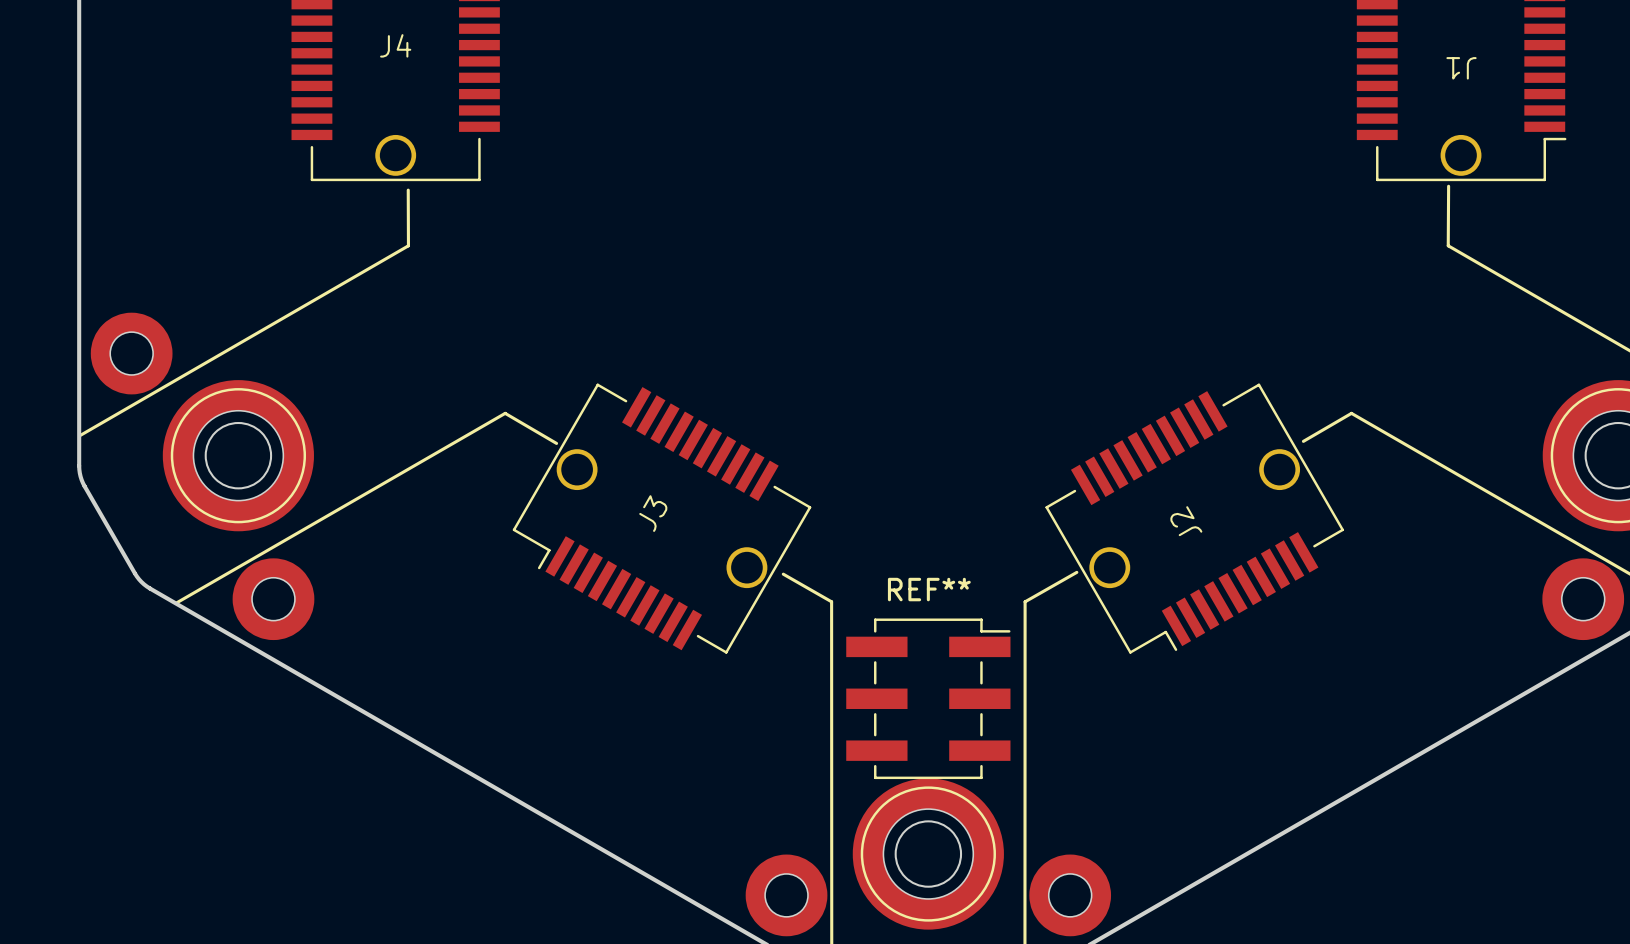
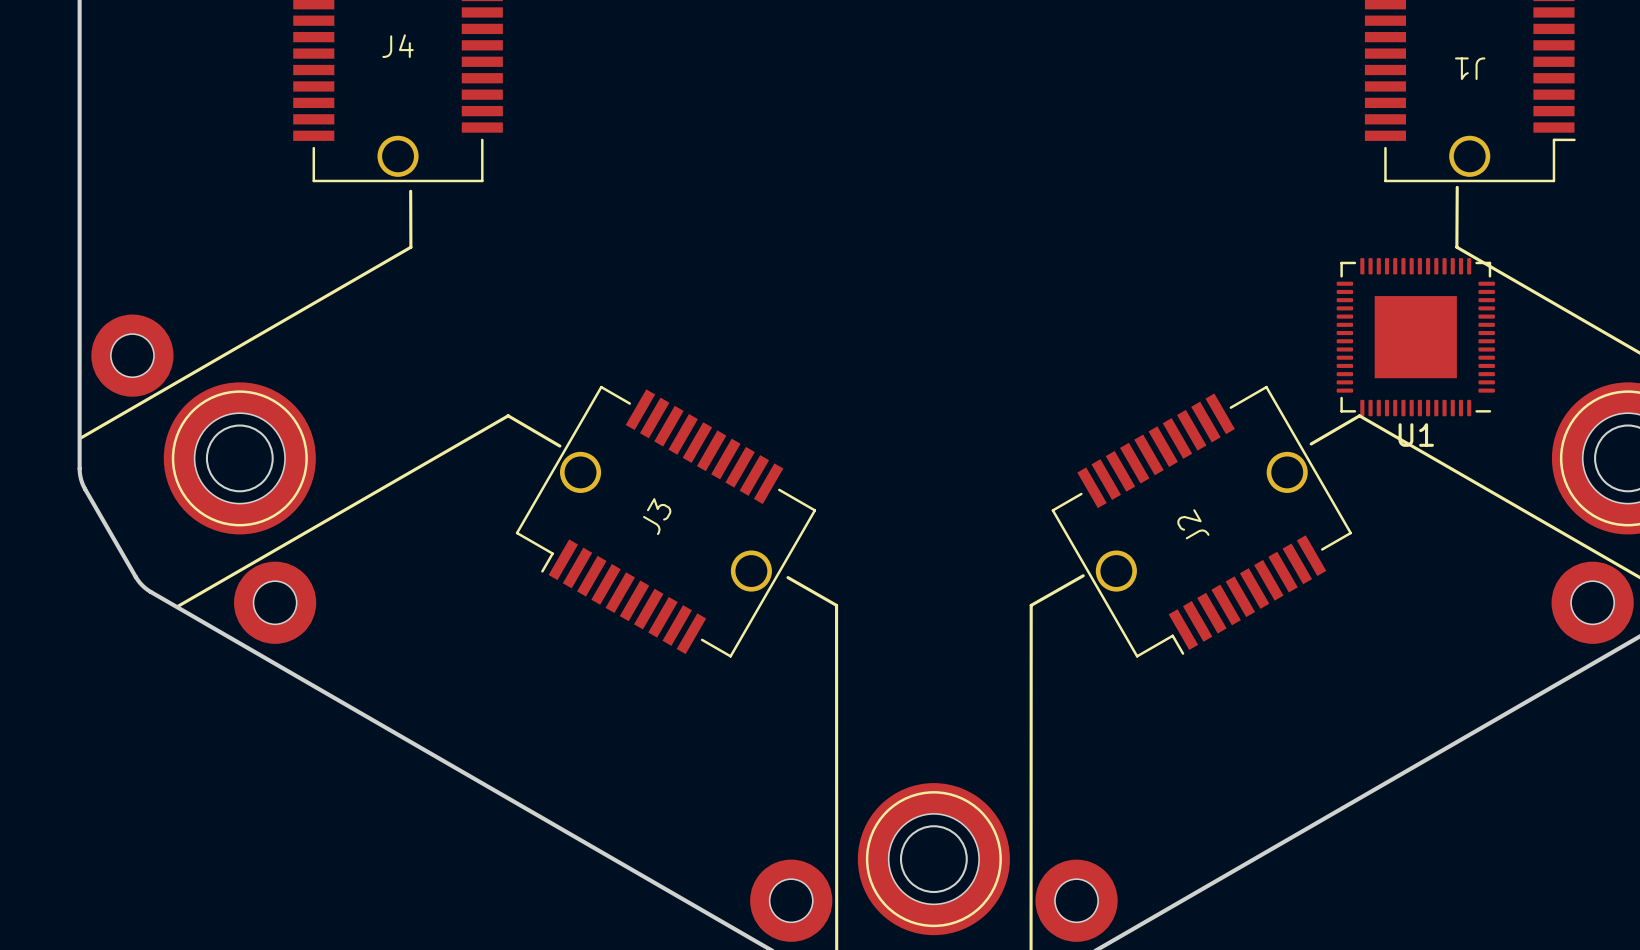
U1: none -> (1415, 337)
REF**: (928, 698) -> none

